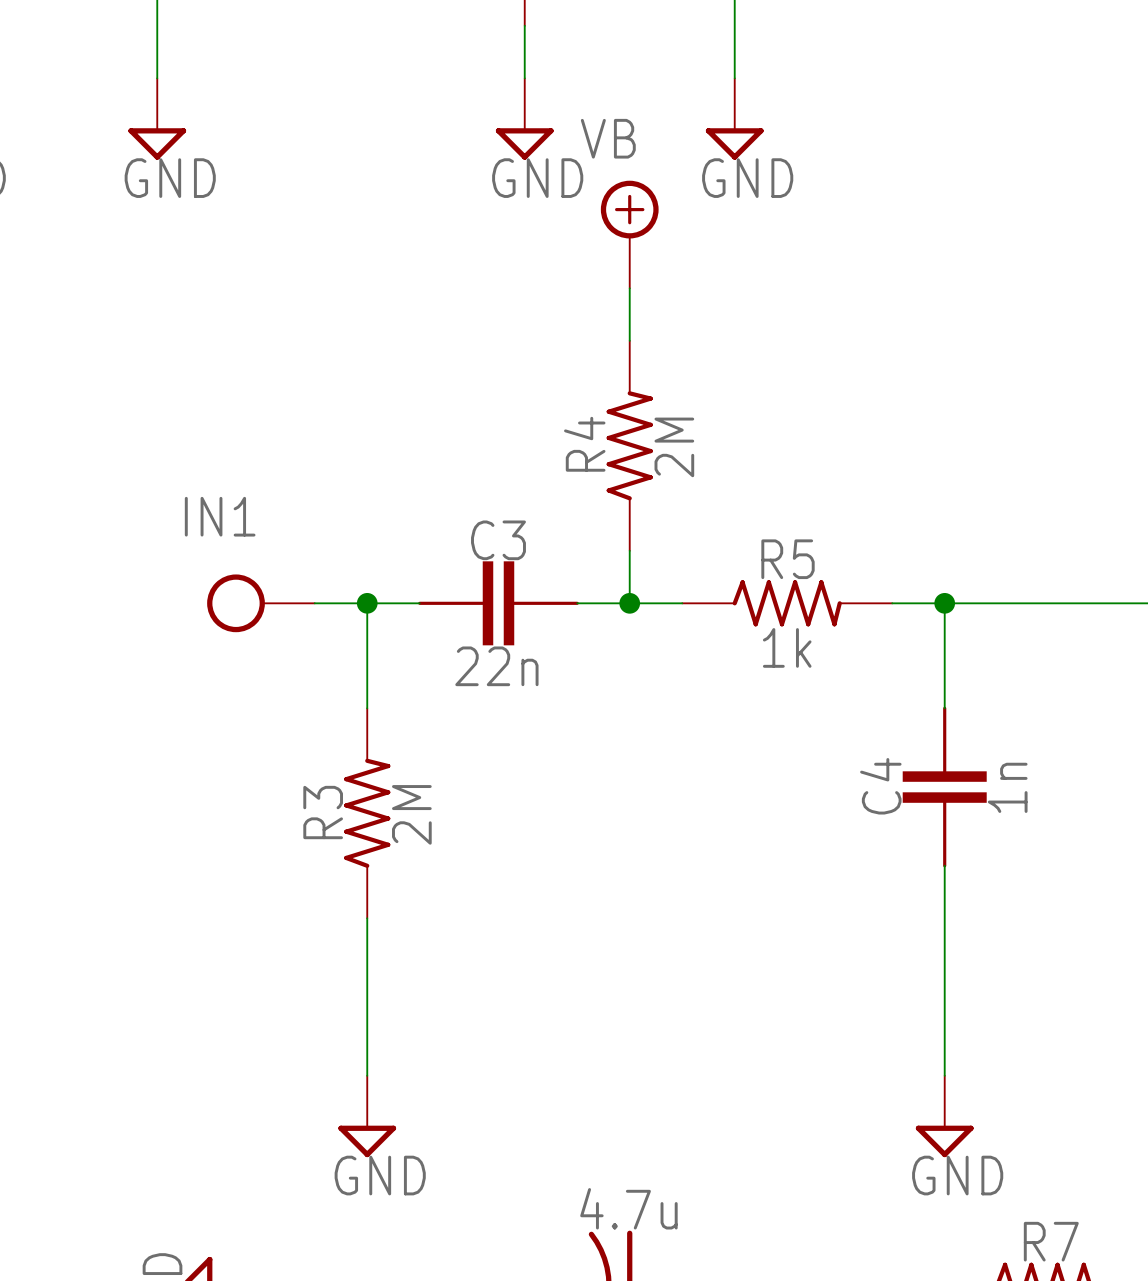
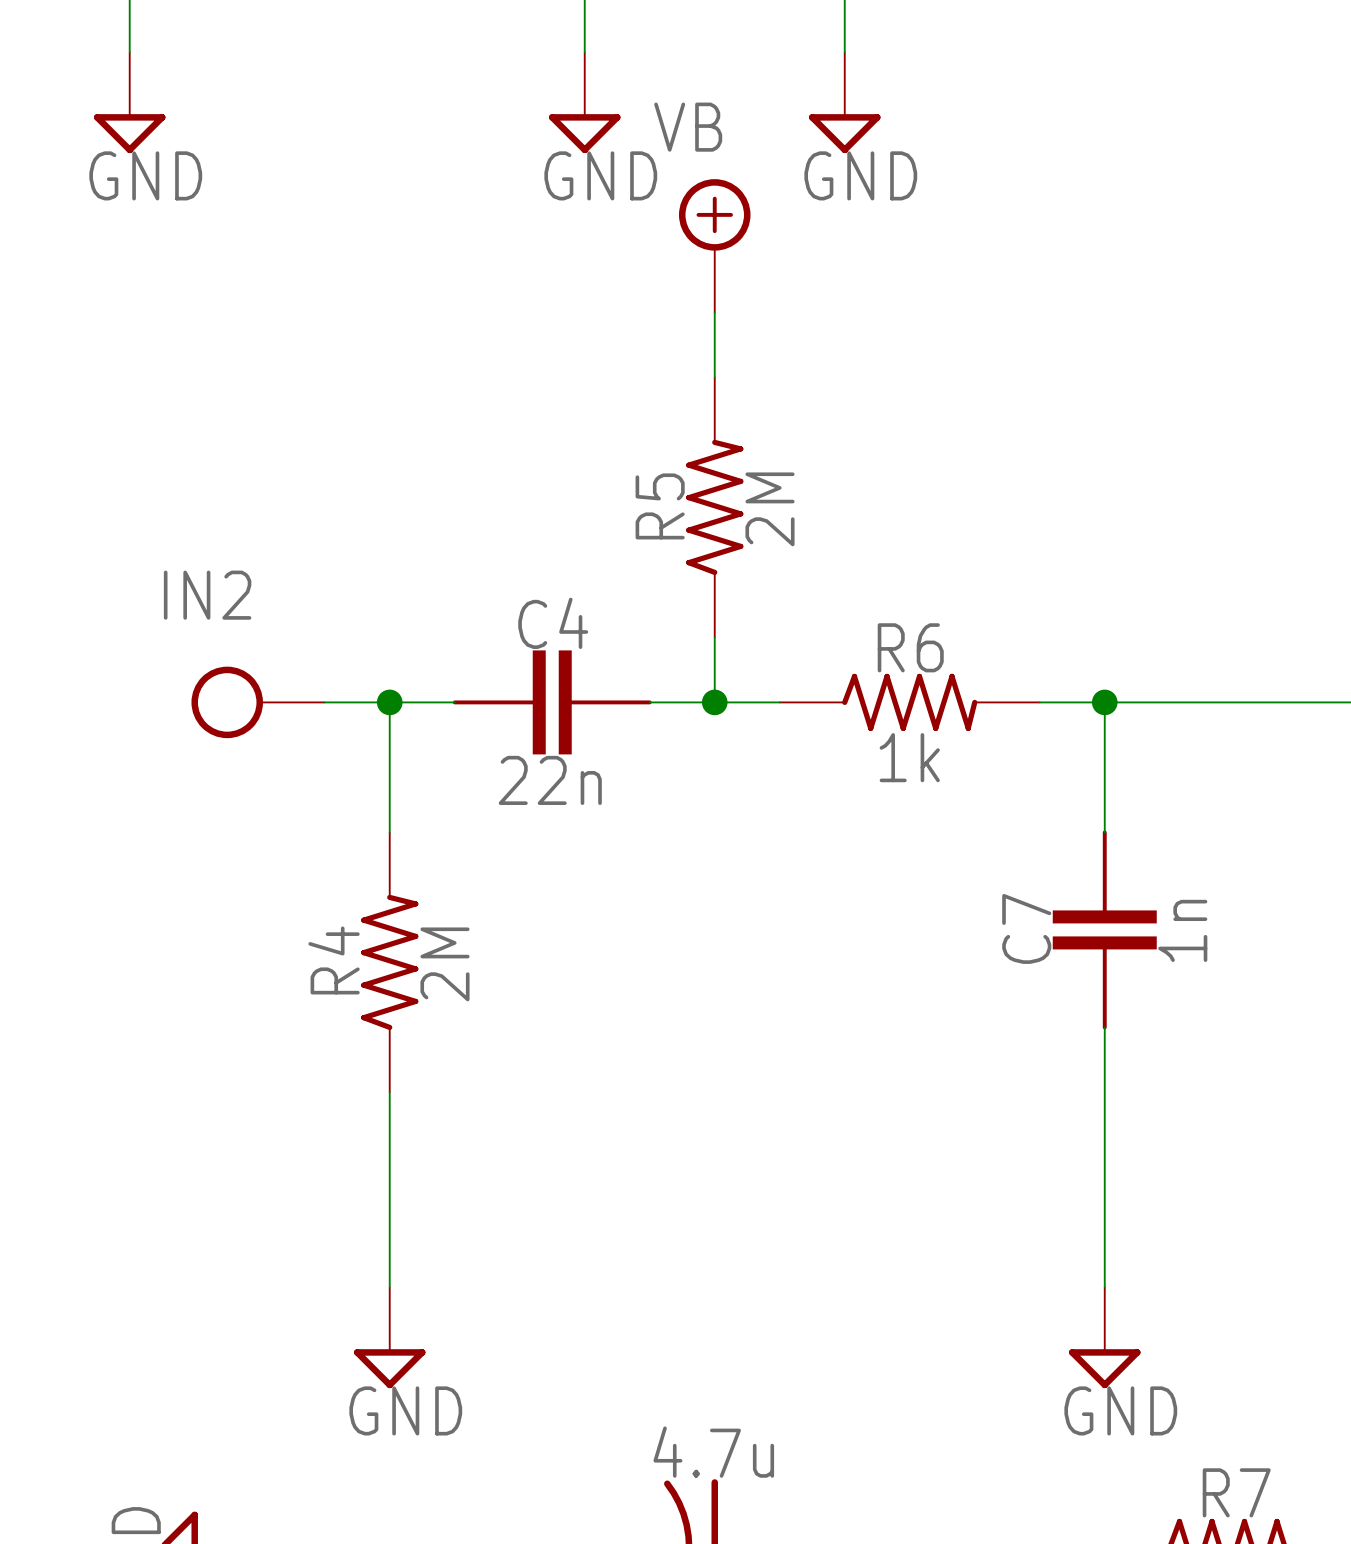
R4 name: R4 (584, 444) -> R5 (660, 506)
IN1 name: IN1 (220, 516) -> IN2 (207, 595)
C3 name: C3 (498, 540) -> C4 (553, 623)
R5 name: R5 (788, 559) -> R6 (910, 647)
C4 name: C4 (880, 786) -> C7 (1026, 928)
R3 name: R3 (323, 812) -> R4 (334, 960)

